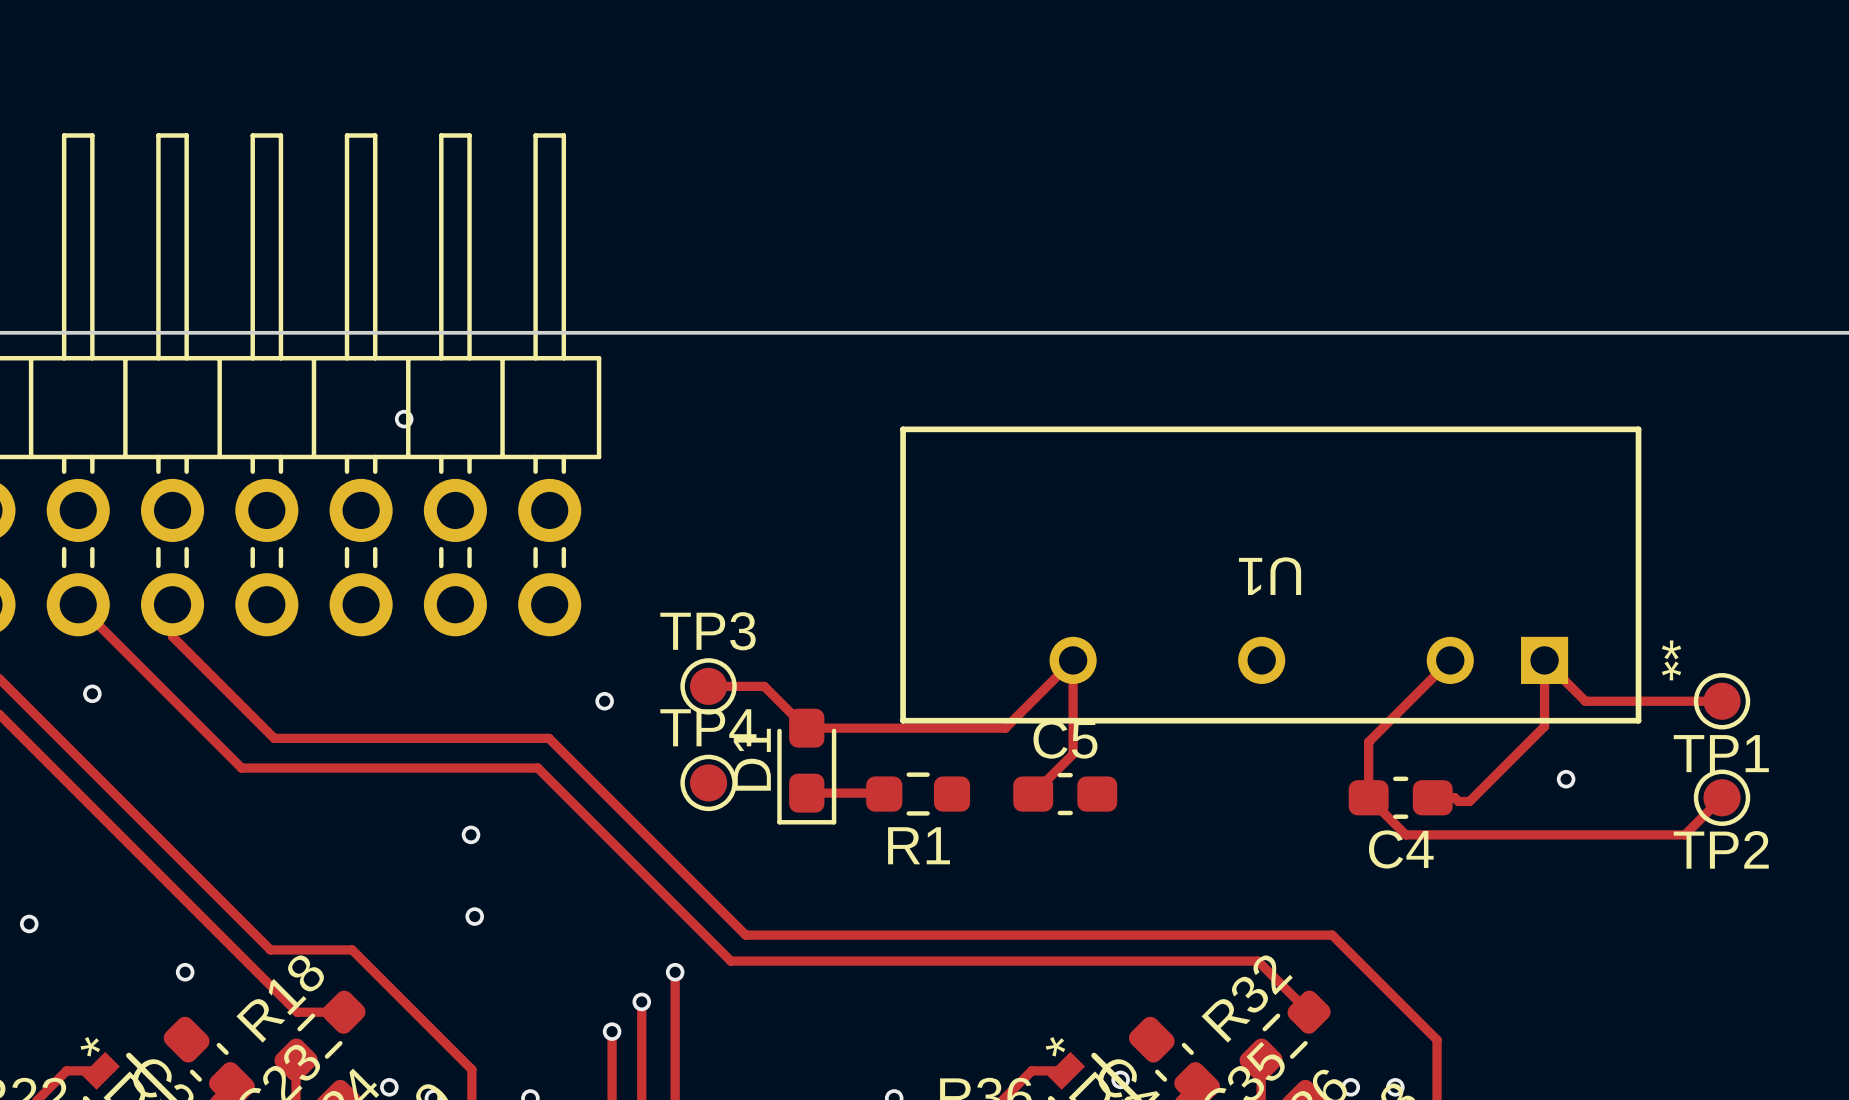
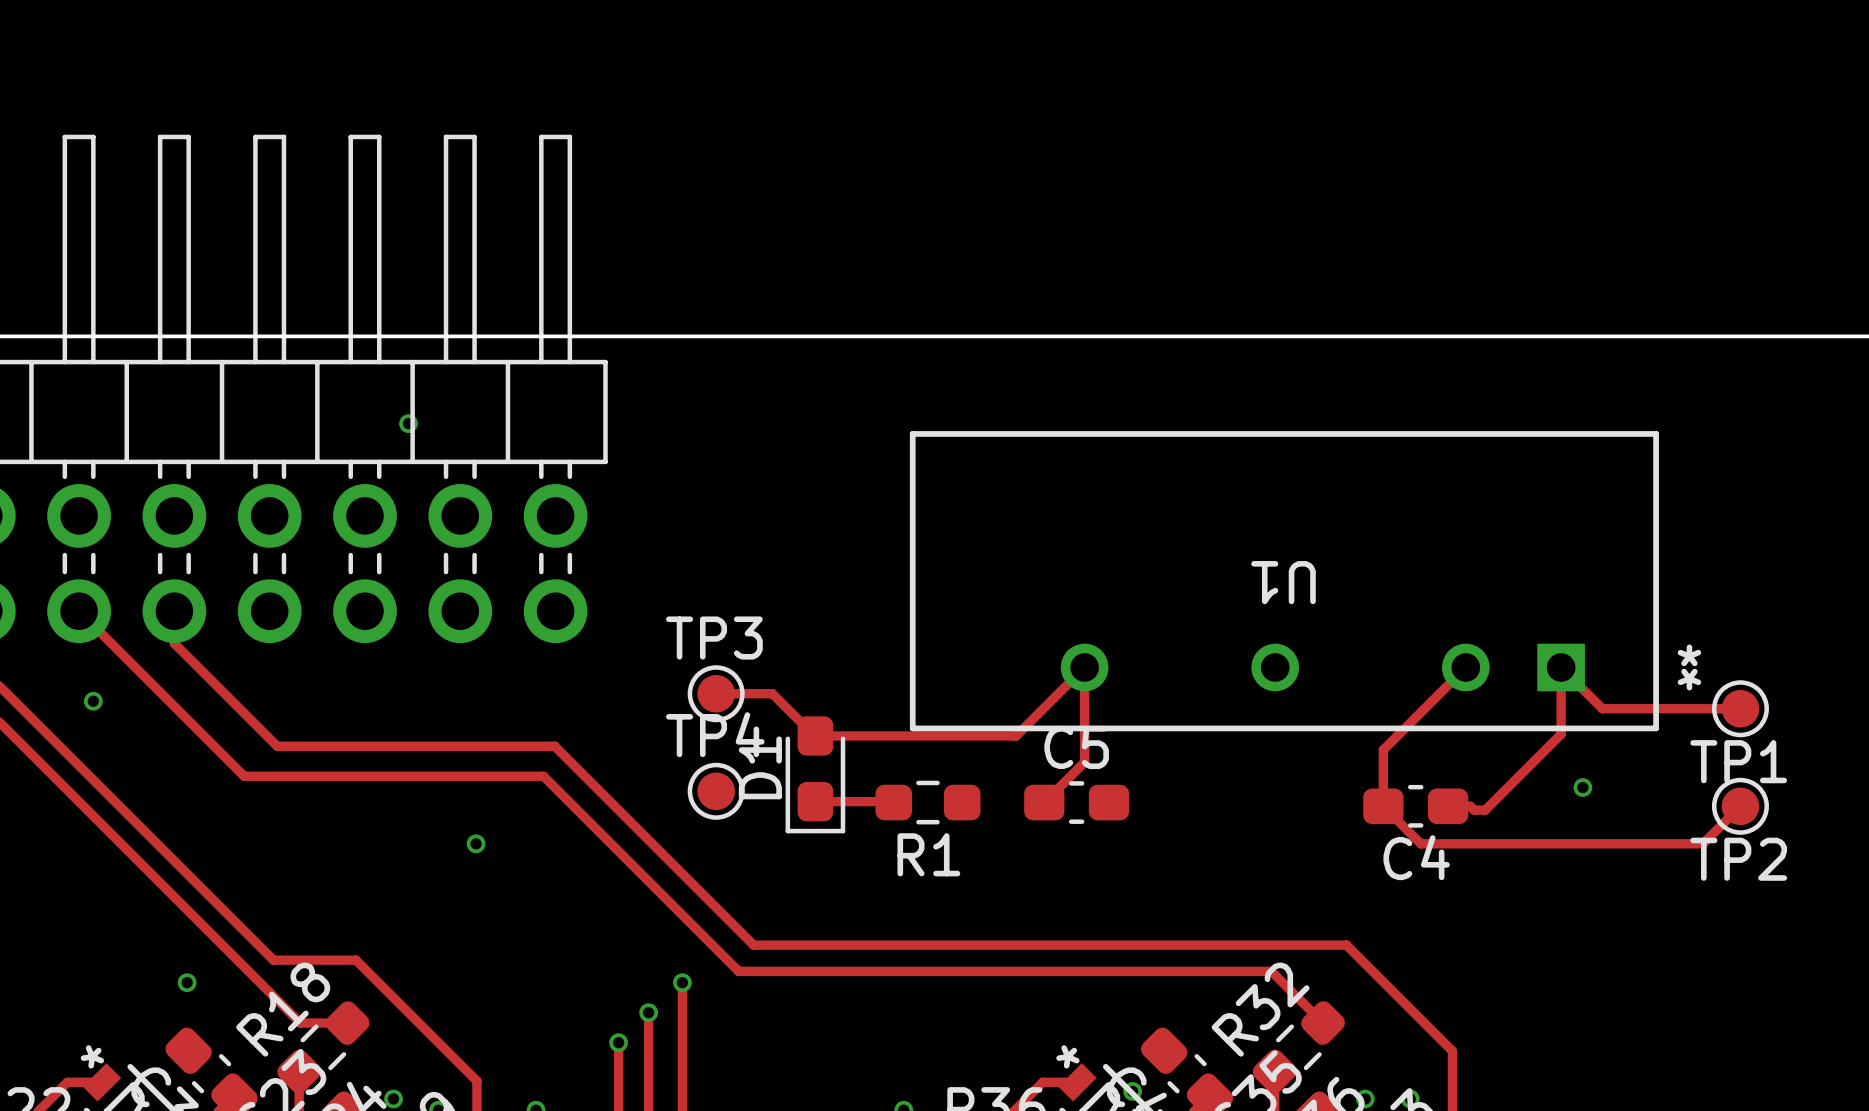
via: (604, 701) -> none
via: (474, 916) -> none
via: (29, 923) -> none

